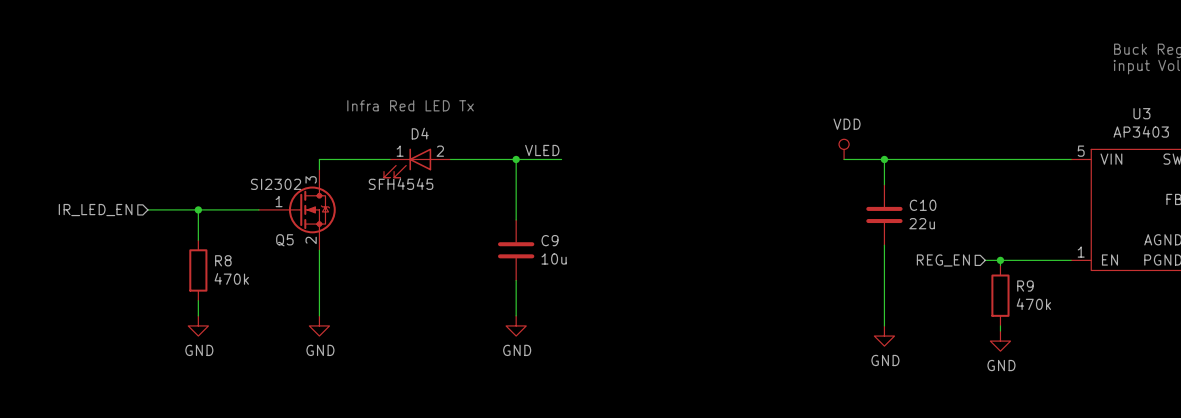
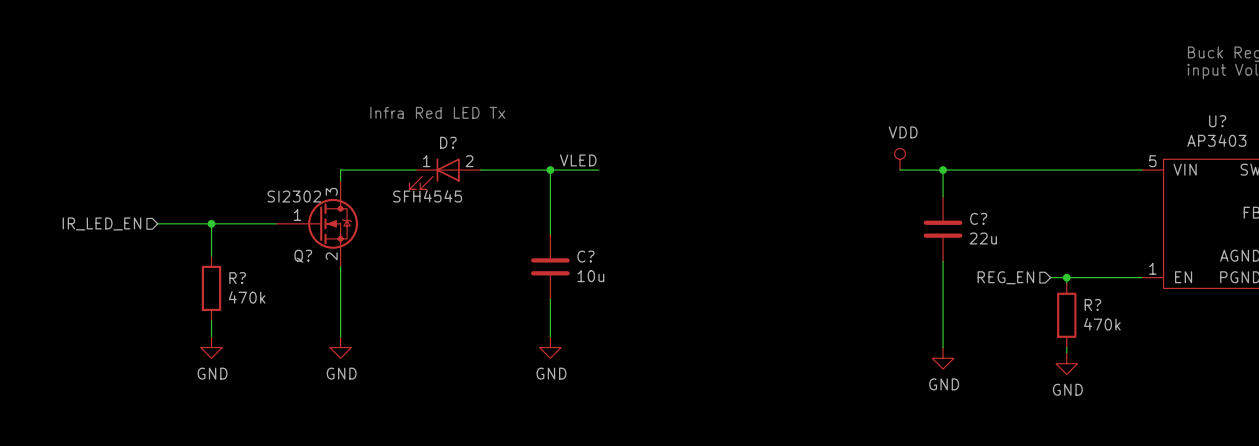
U3 name: U3 (1141, 113) -> U? (1217, 121)
D4 name: D4 (420, 133) -> D? (448, 142)
C10 name: C10 (923, 205) -> C? (978, 218)
Q5 name: Q5 (284, 240) -> Q? (303, 256)
C9 name: C9 (550, 240) -> C? (585, 256)
R8 name: R8 (223, 260) -> R? (237, 278)
R9 name: R9 (1025, 286) -> R? (1092, 304)

